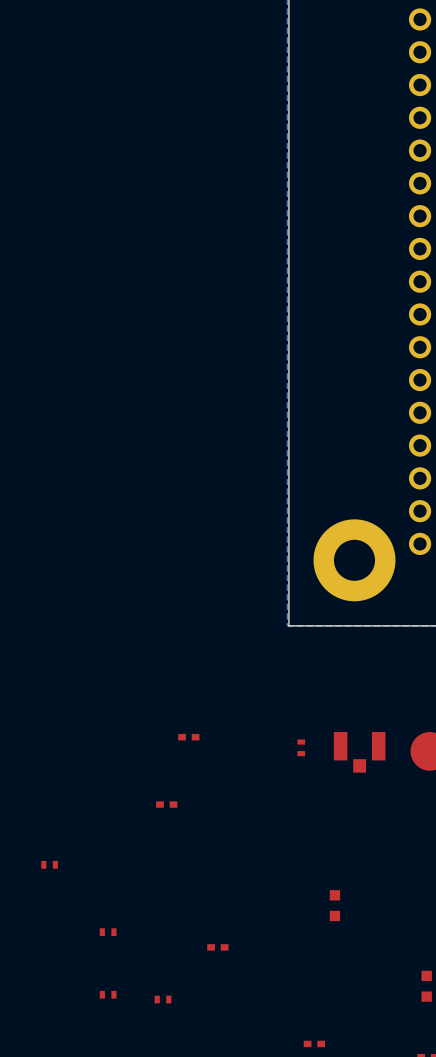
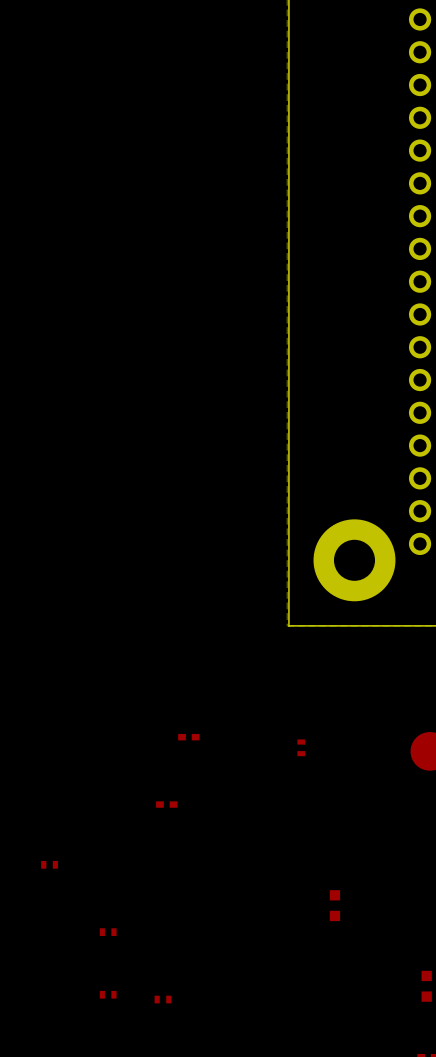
part: (359, 752) -> none
part: (217, 947) -> none
part: (314, 1043) -> none

